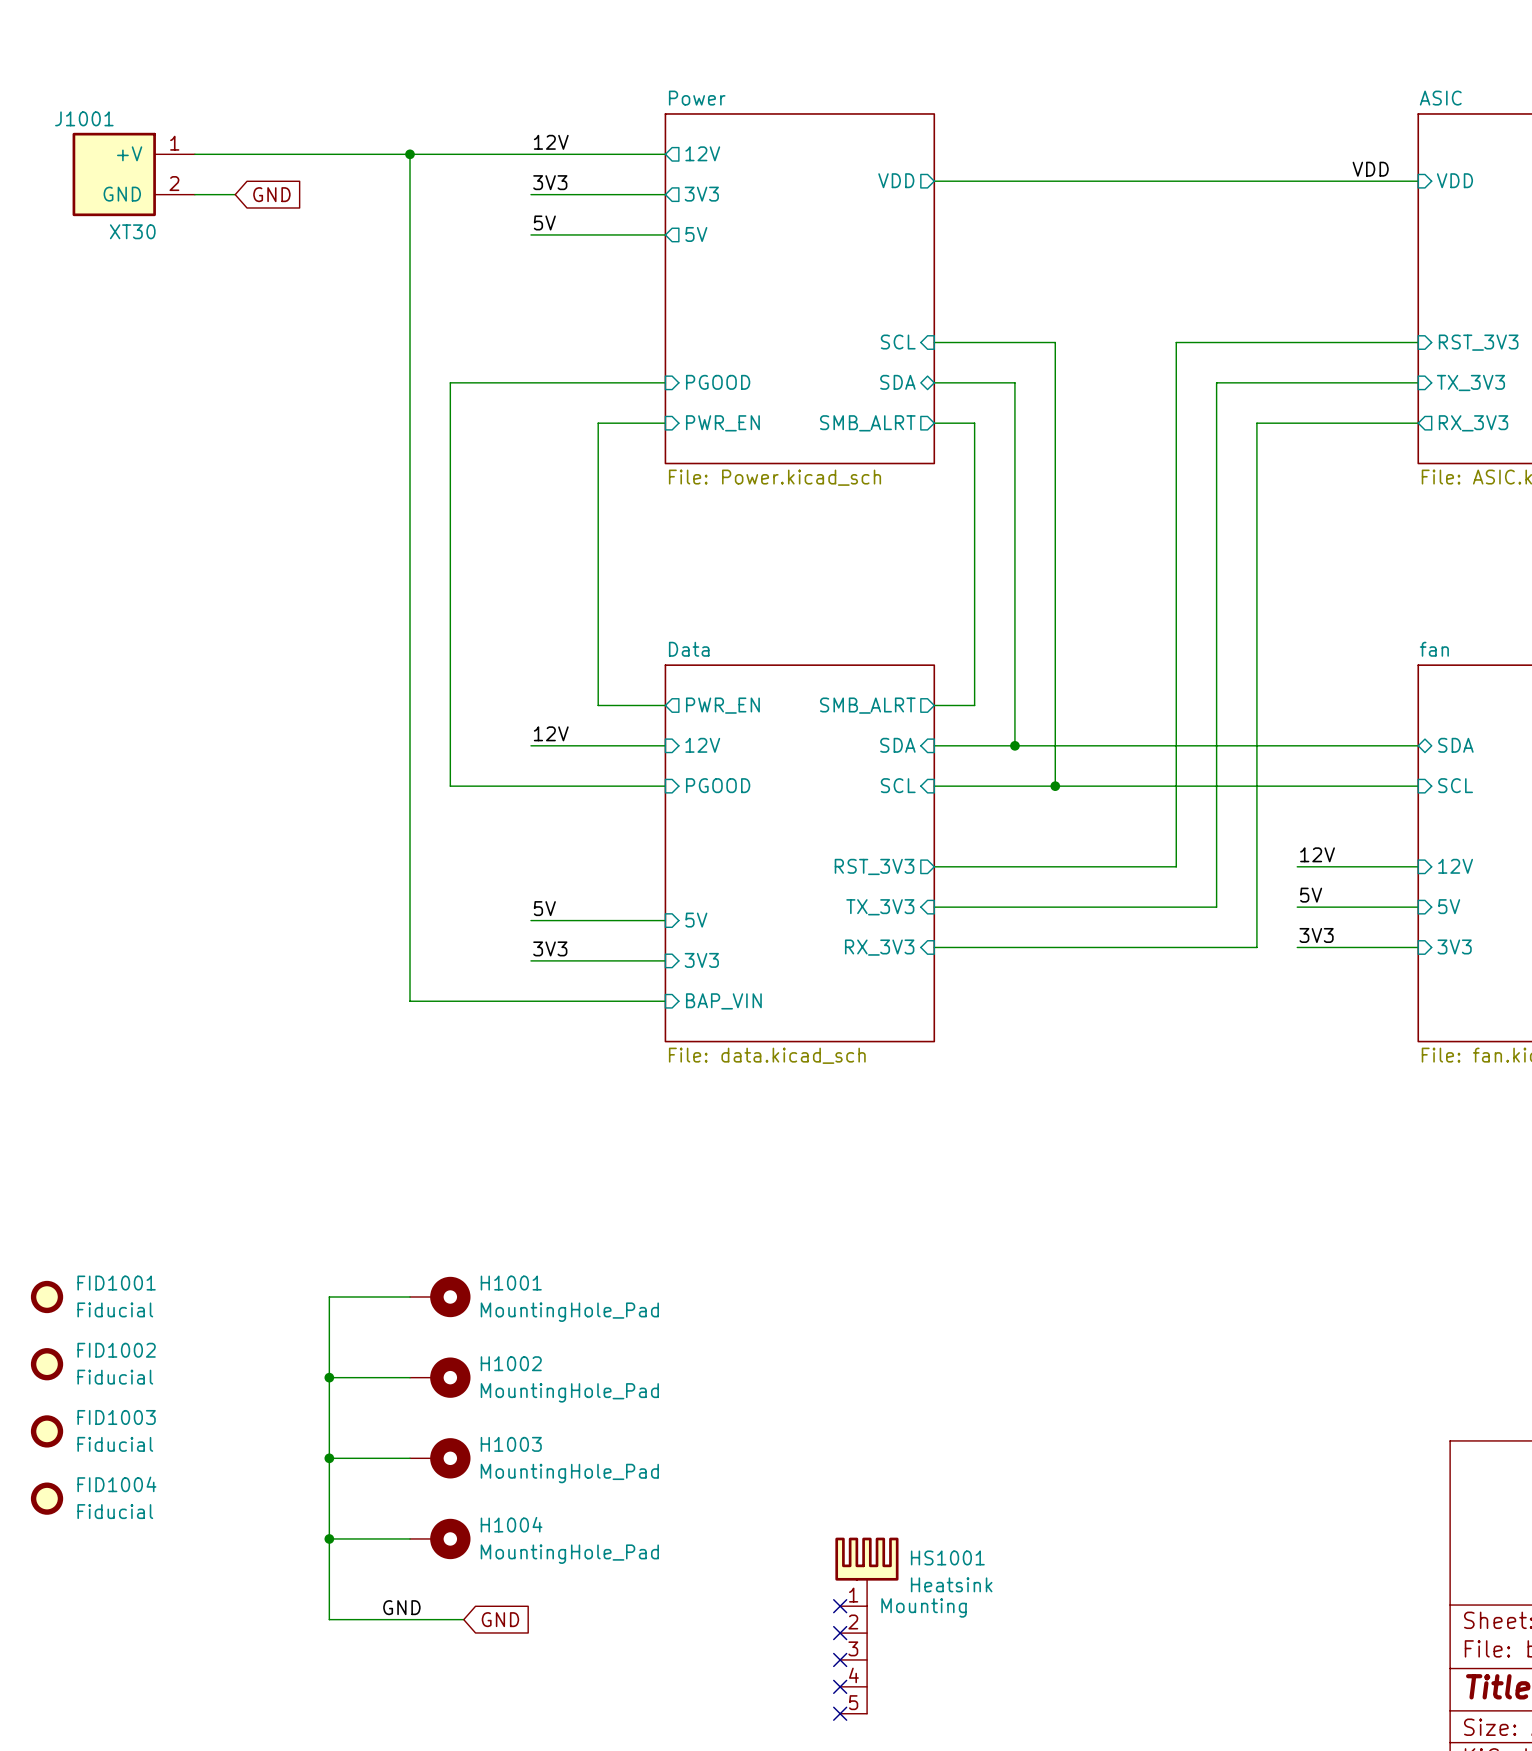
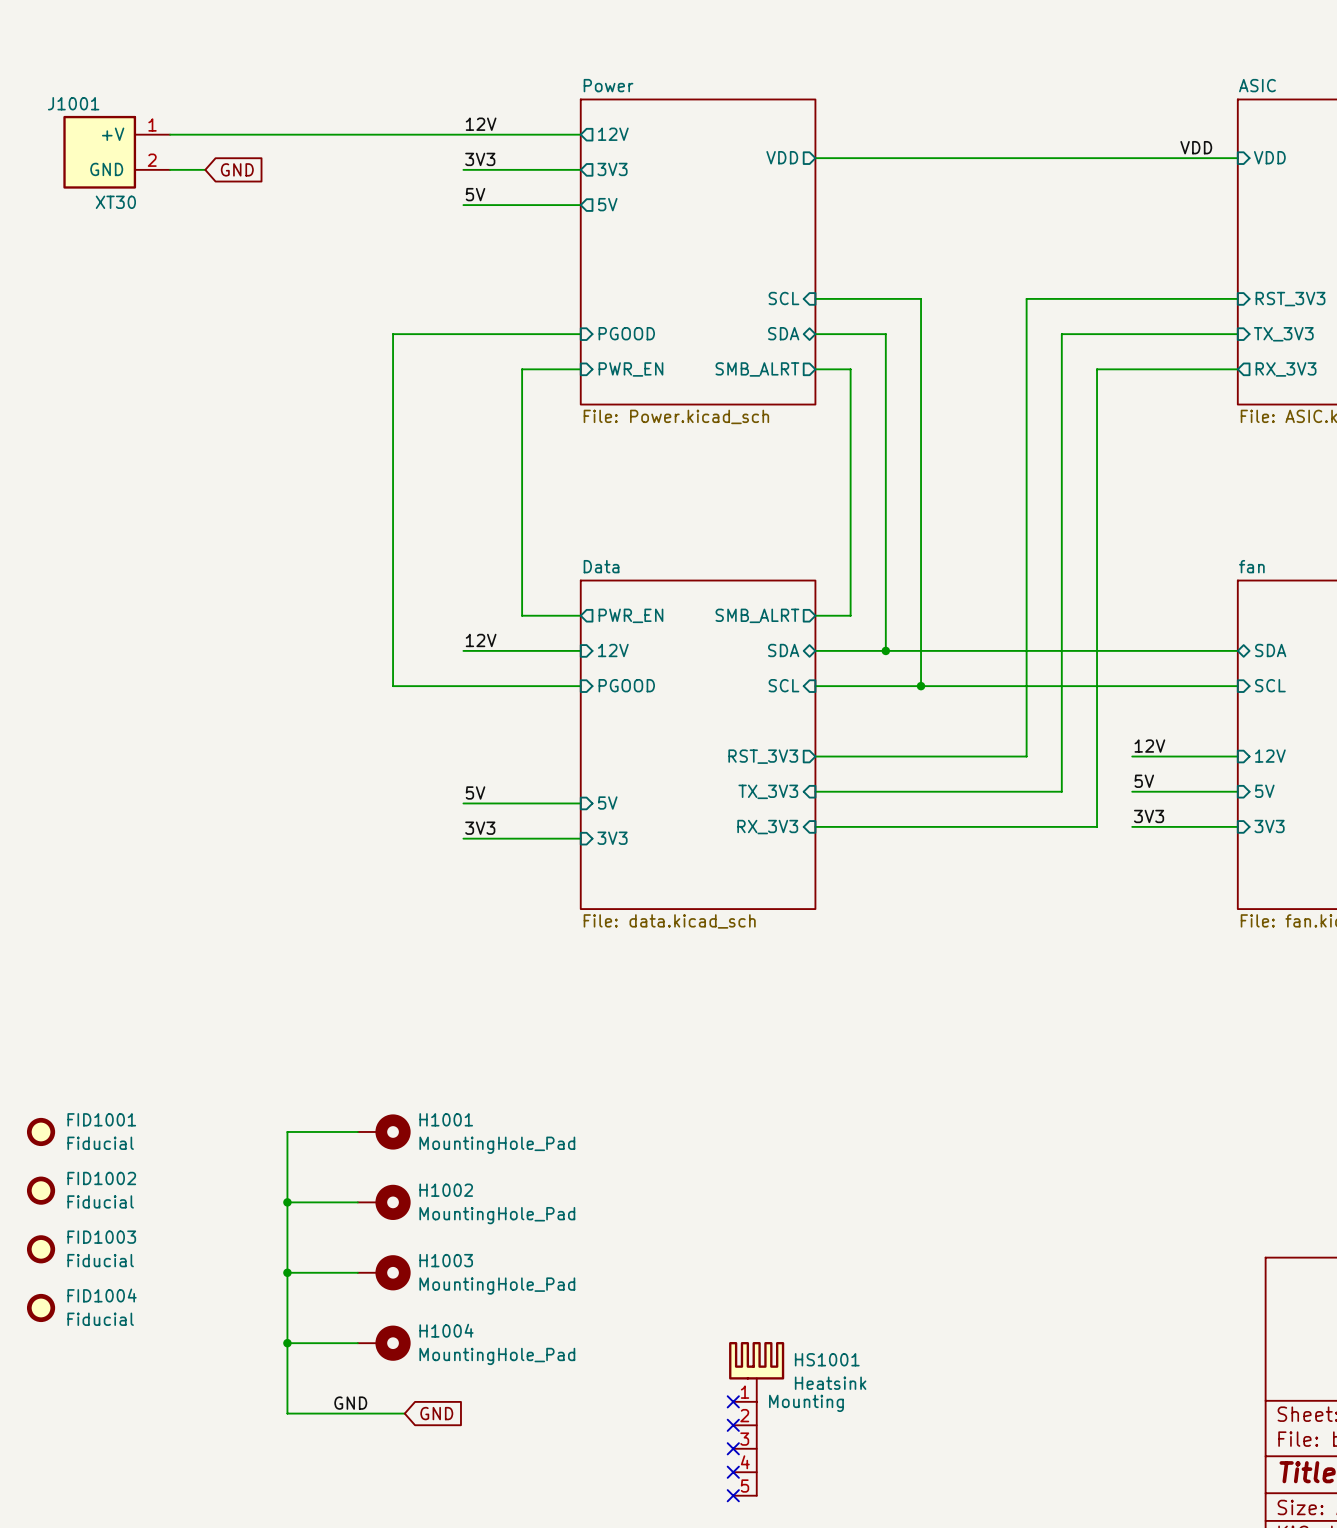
wire: (410, 154) (410, 1001) (665, 1001) -> none
junction: (410, 154) -> none
sheet pin shape: input (897, 745) -> bidirectional (783, 650)
sheet pin: BAP_VIN (723, 1001) -> none

